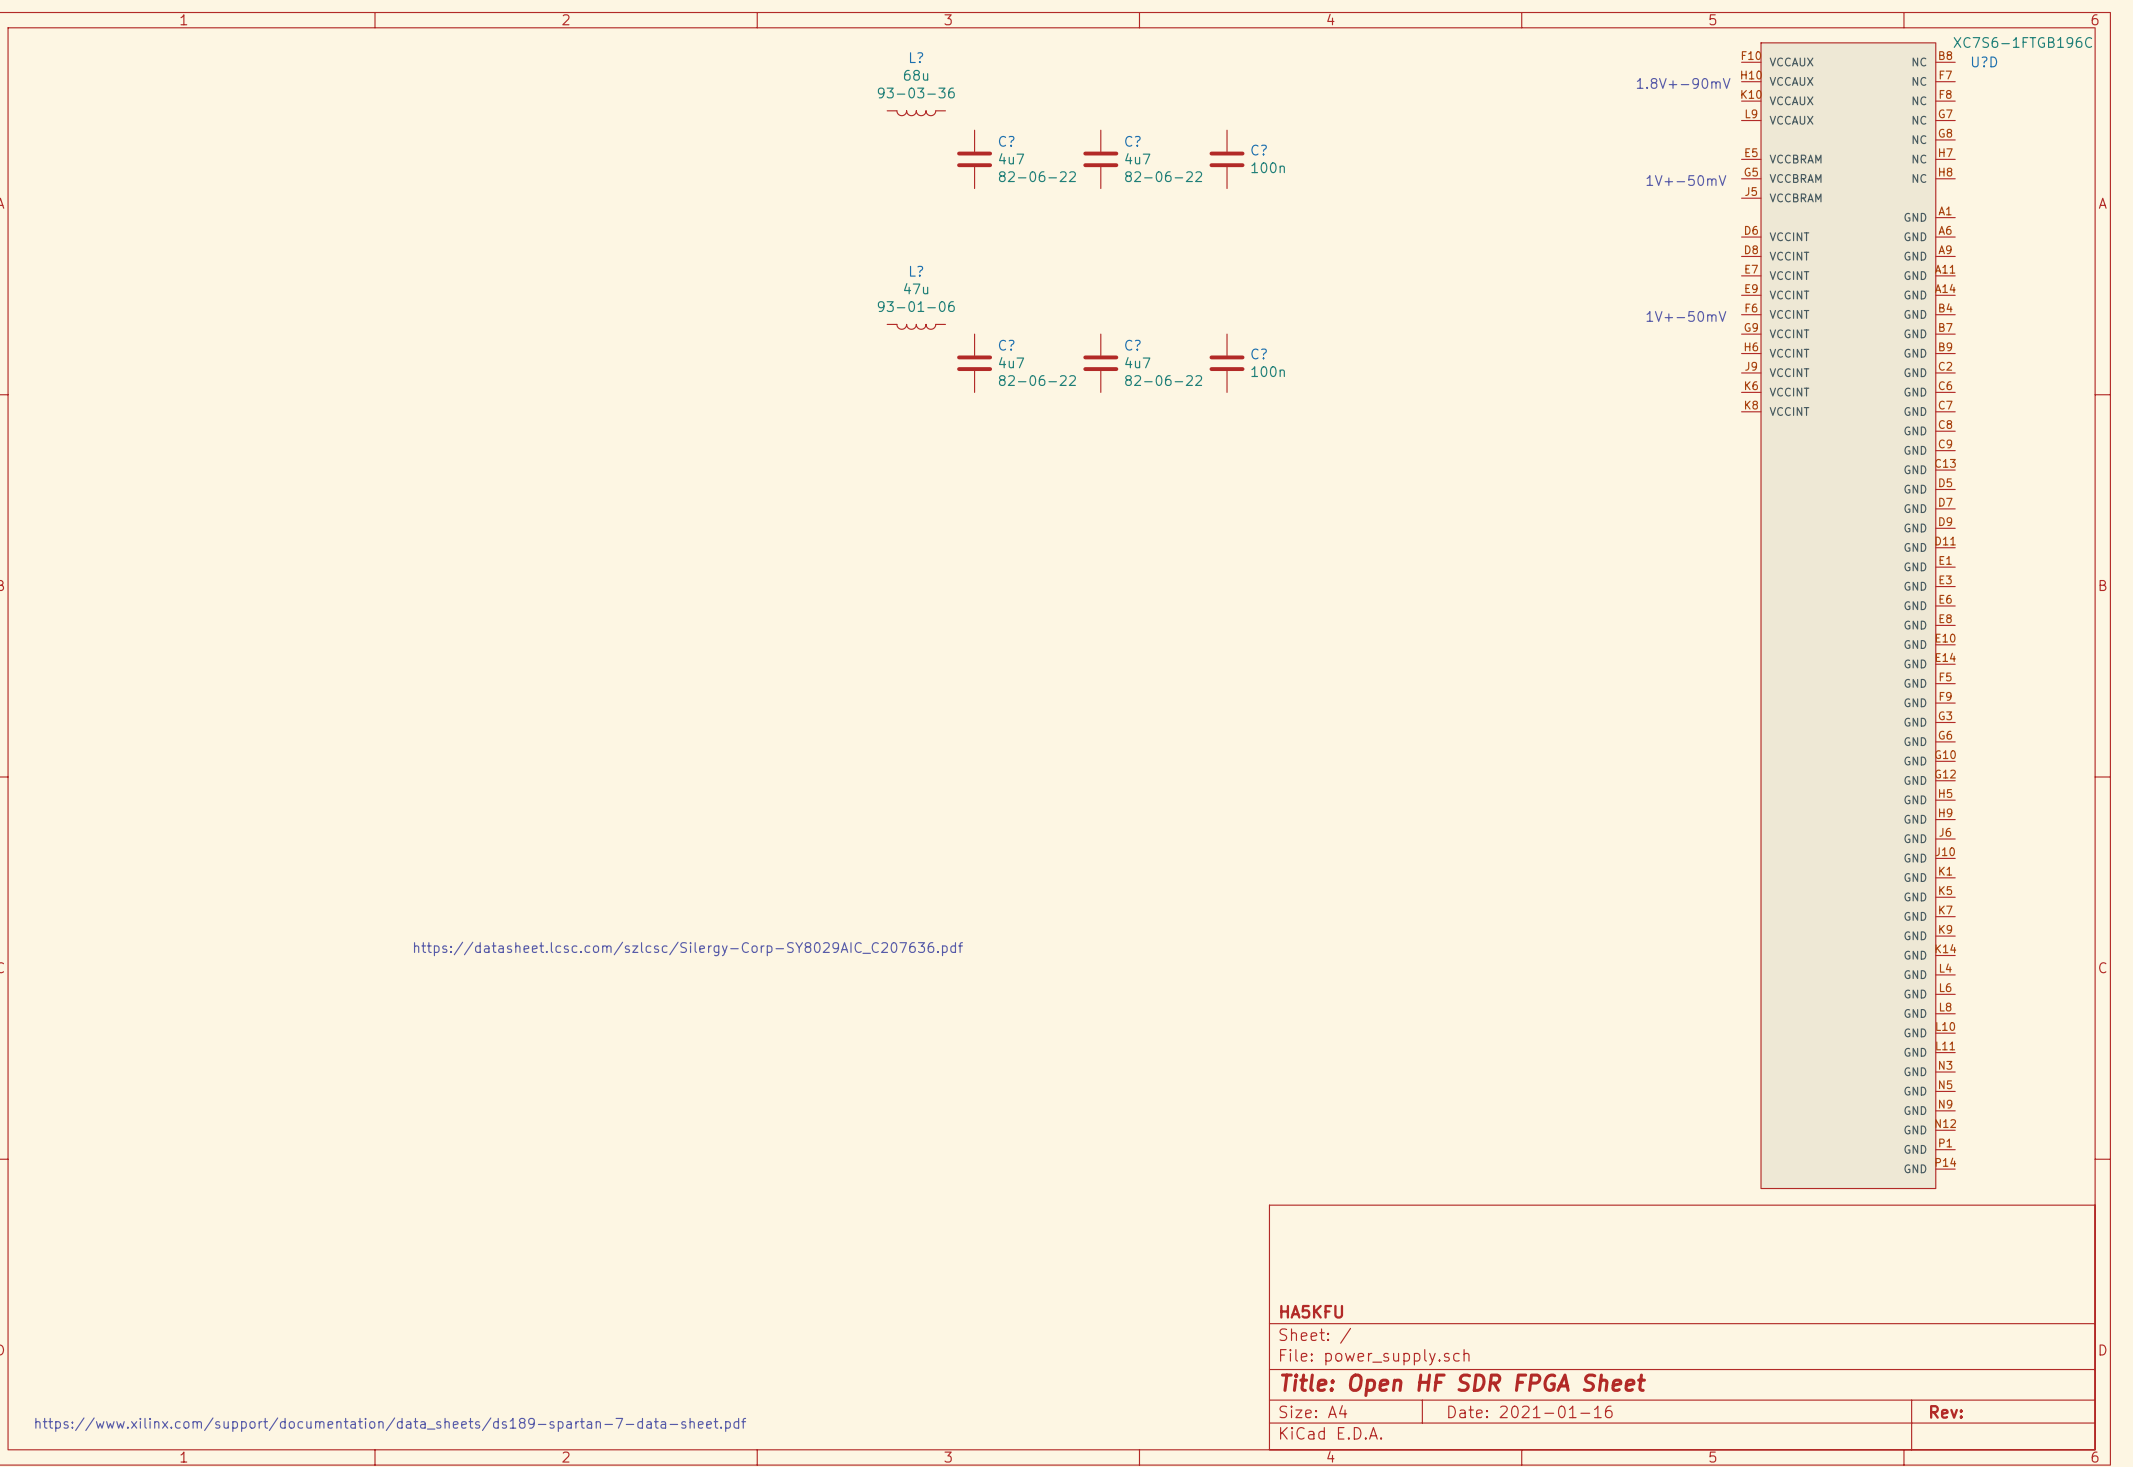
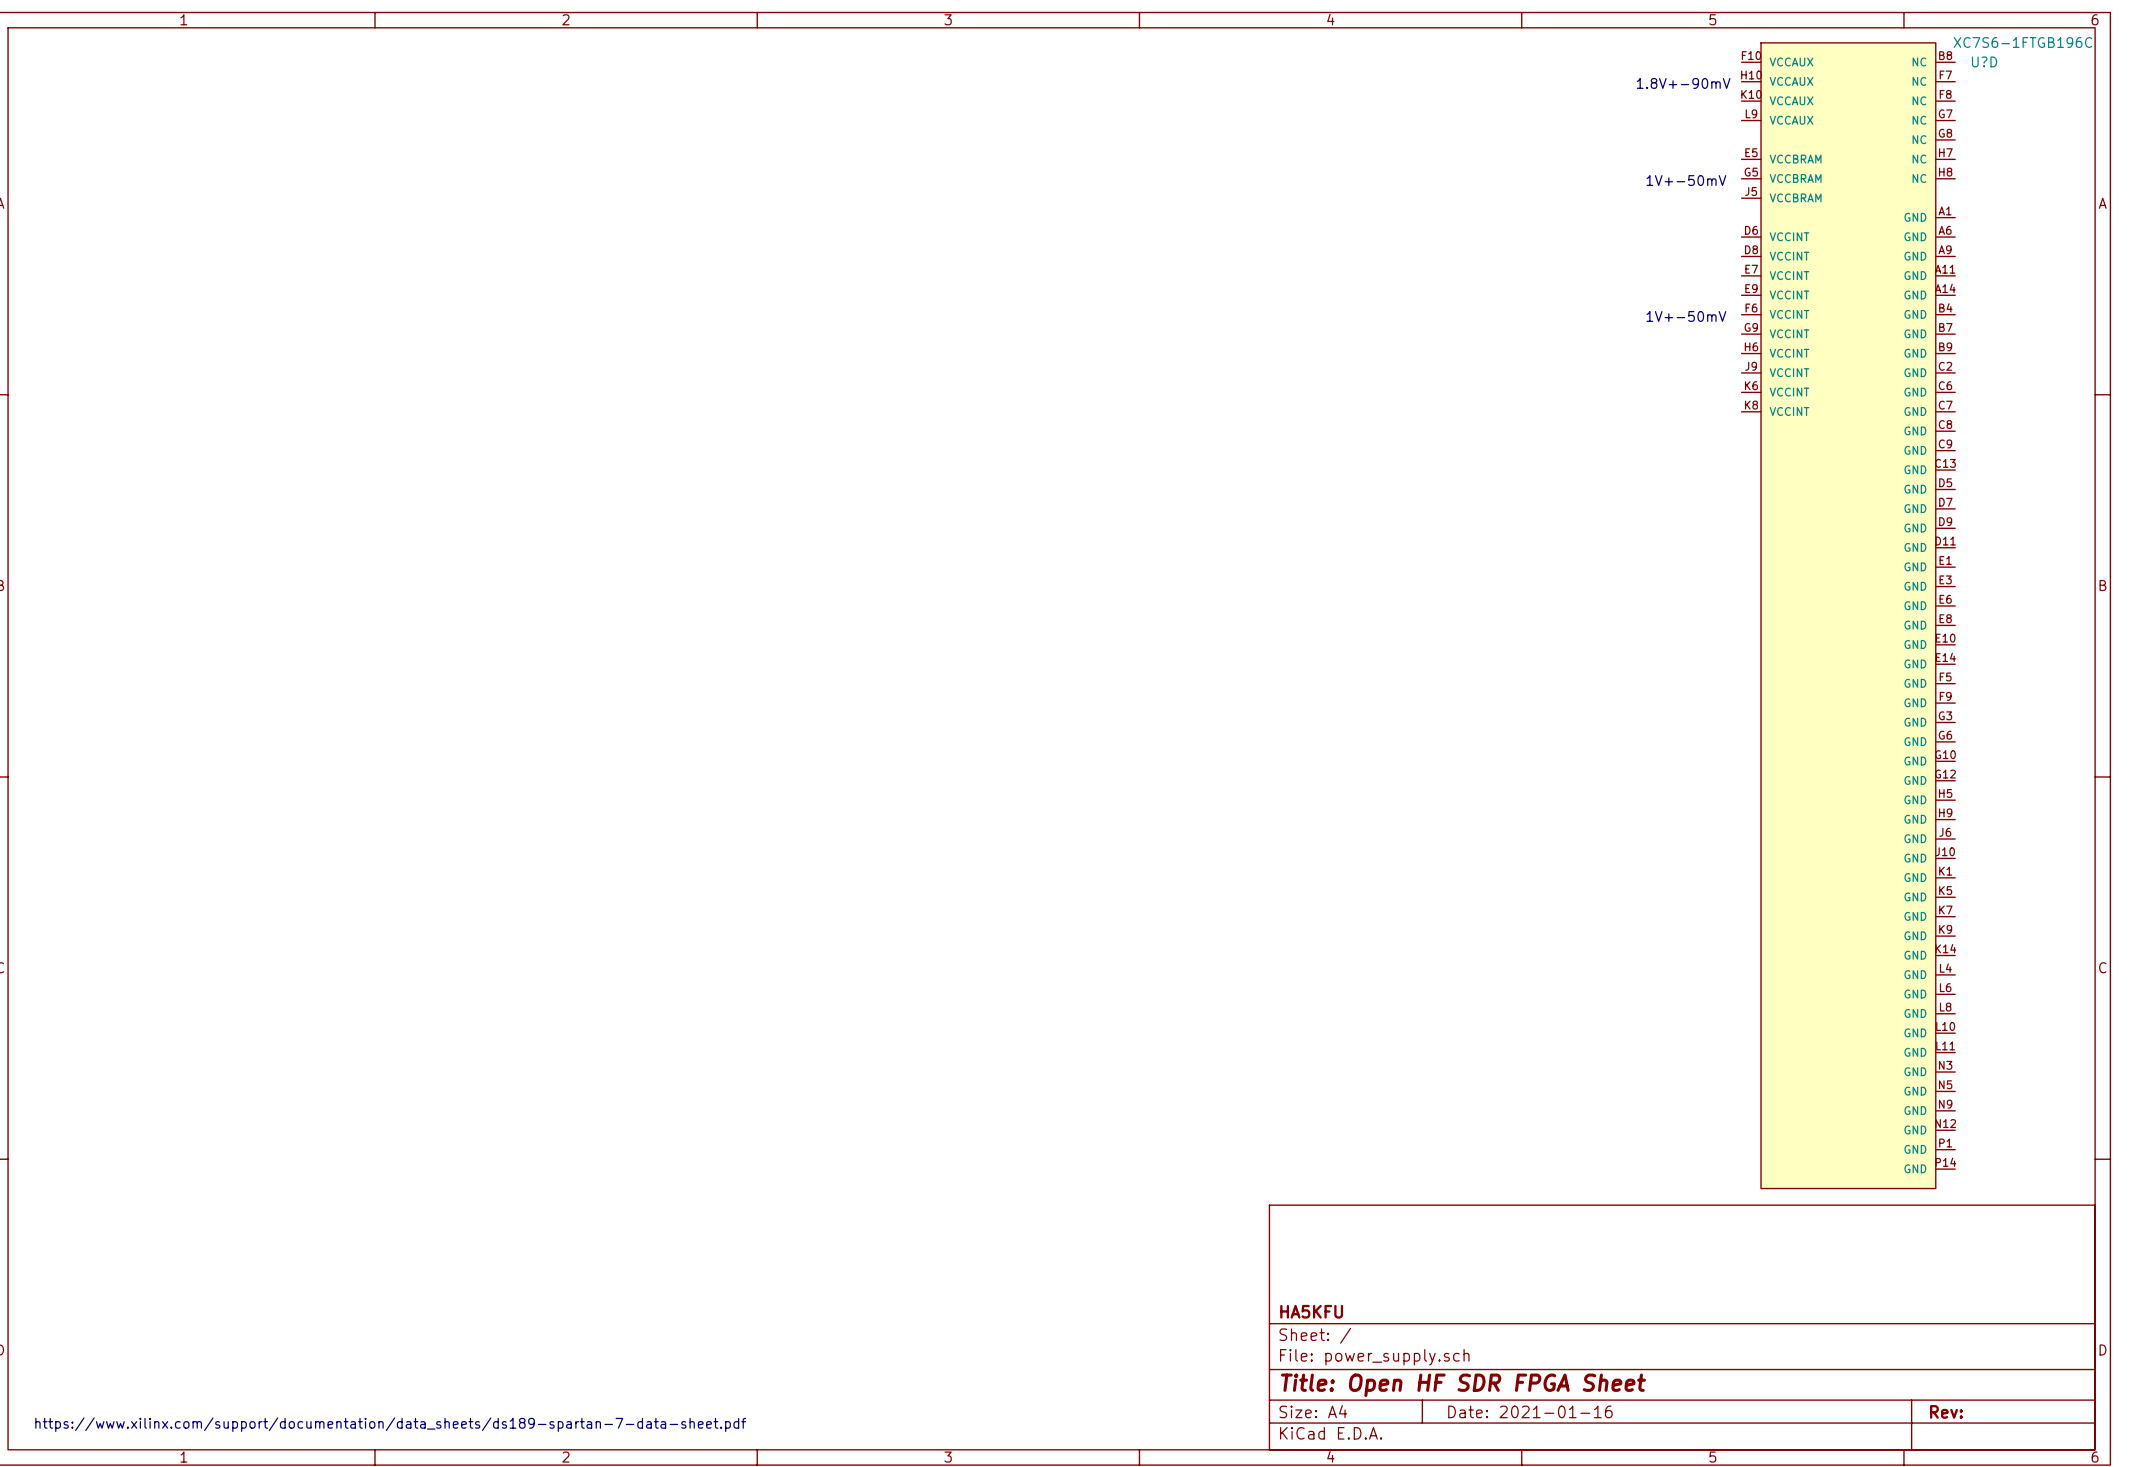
L?: 68u (916, 113) -> none
C?: 4u7 (974, 159) -> none
C?: 4u7 (1100, 159) -> none
C?: 100n (1227, 159) -> none
L?: 47u (916, 326) -> none
C?: 4u7 (974, 363) -> none
C?: 4u7 (1100, 363) -> none
C?: 100n (1227, 363) -> none
text: https://datasheet.lcsc.com/szlcsc/Silergy-Corp-SY8029AIC_C207636.pdf (688, 948) -> none

